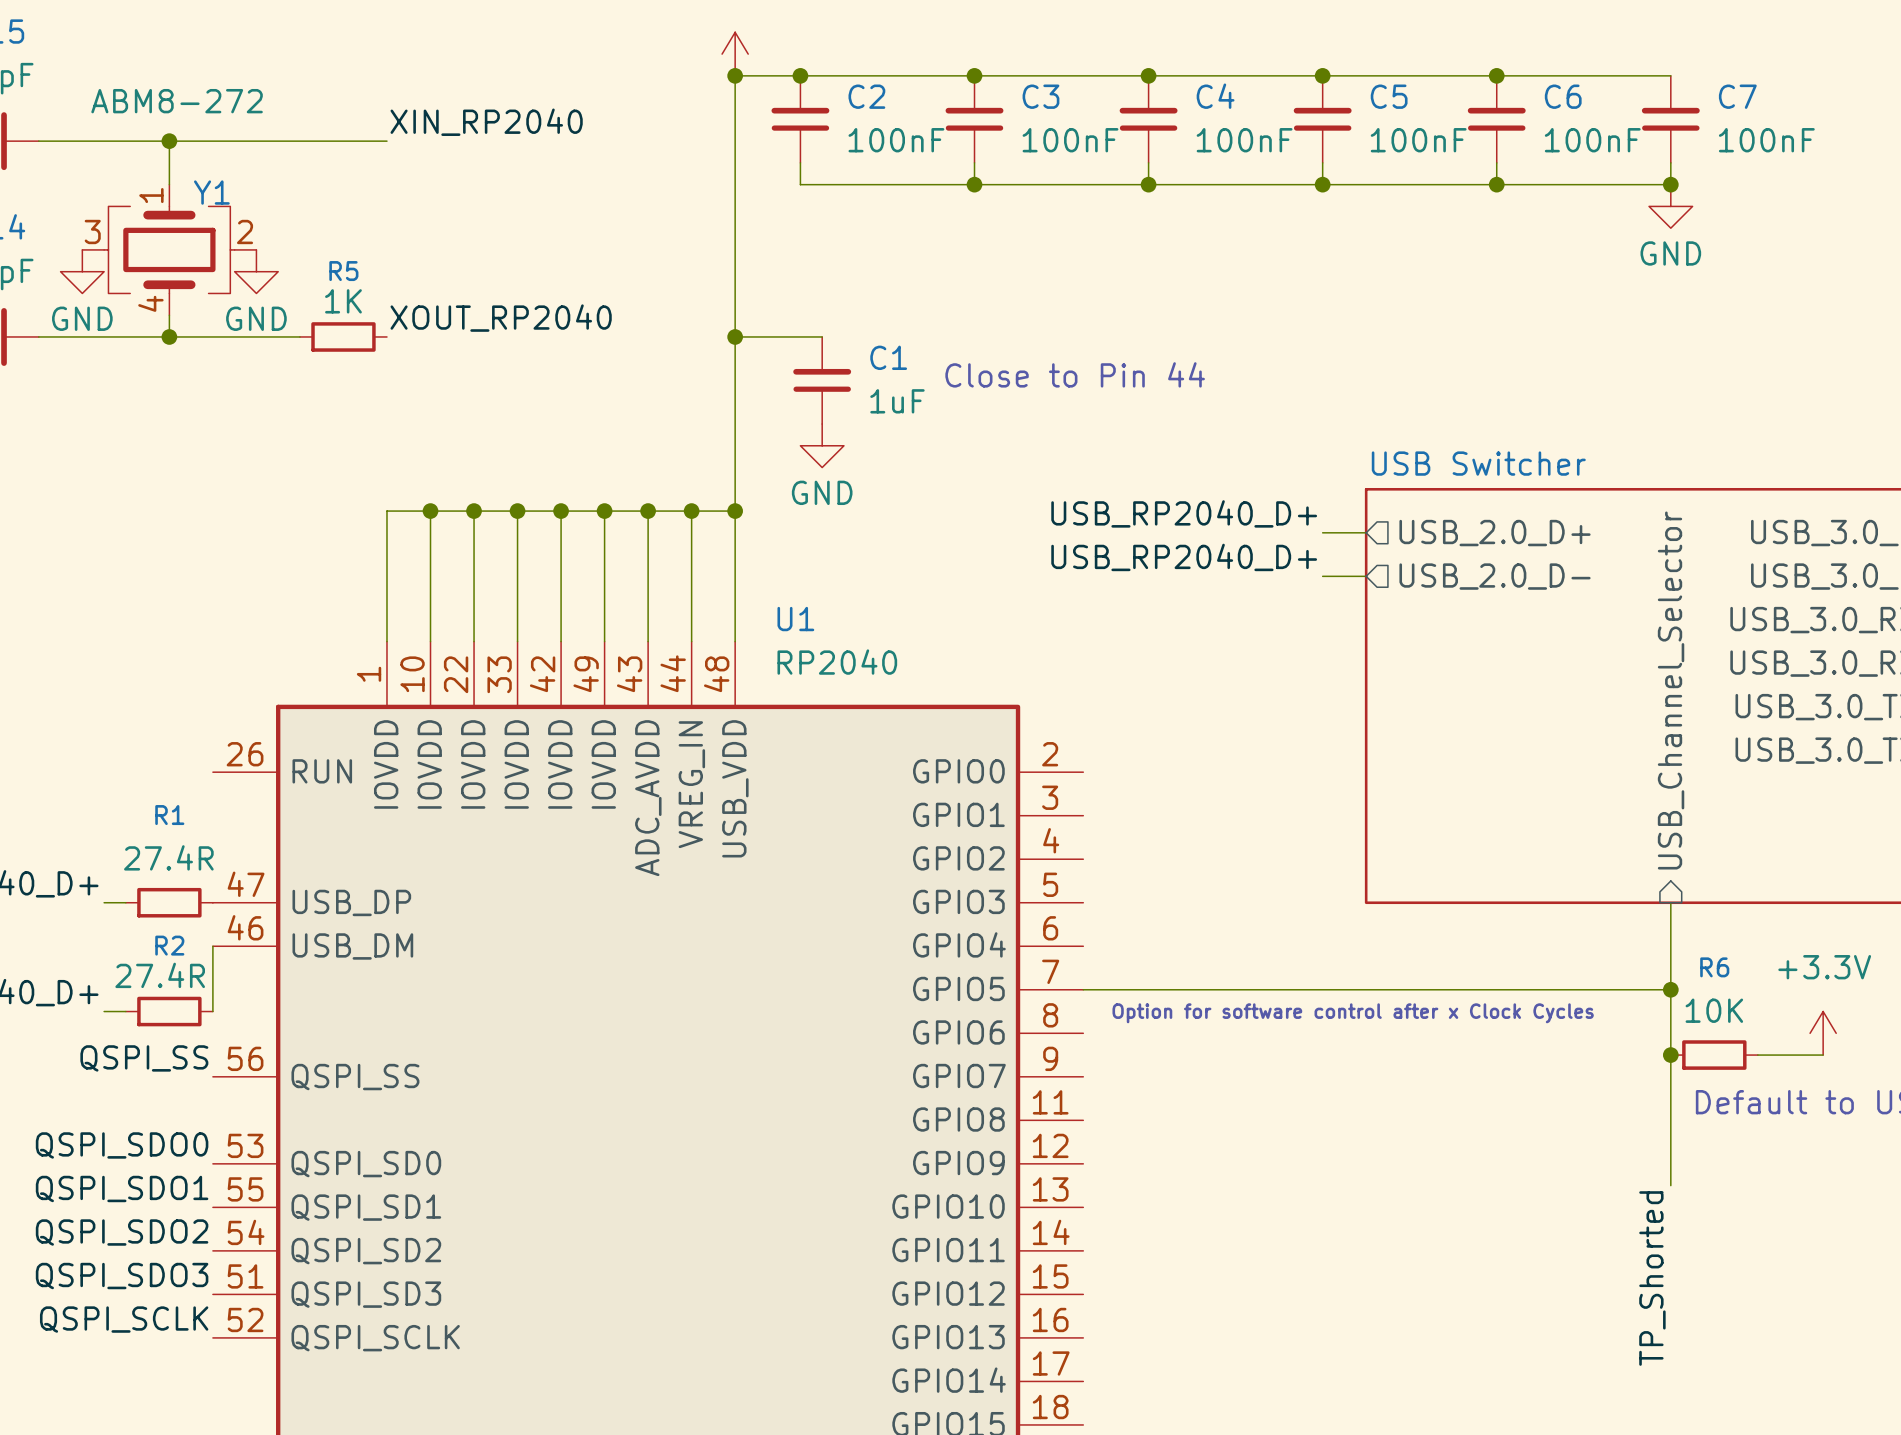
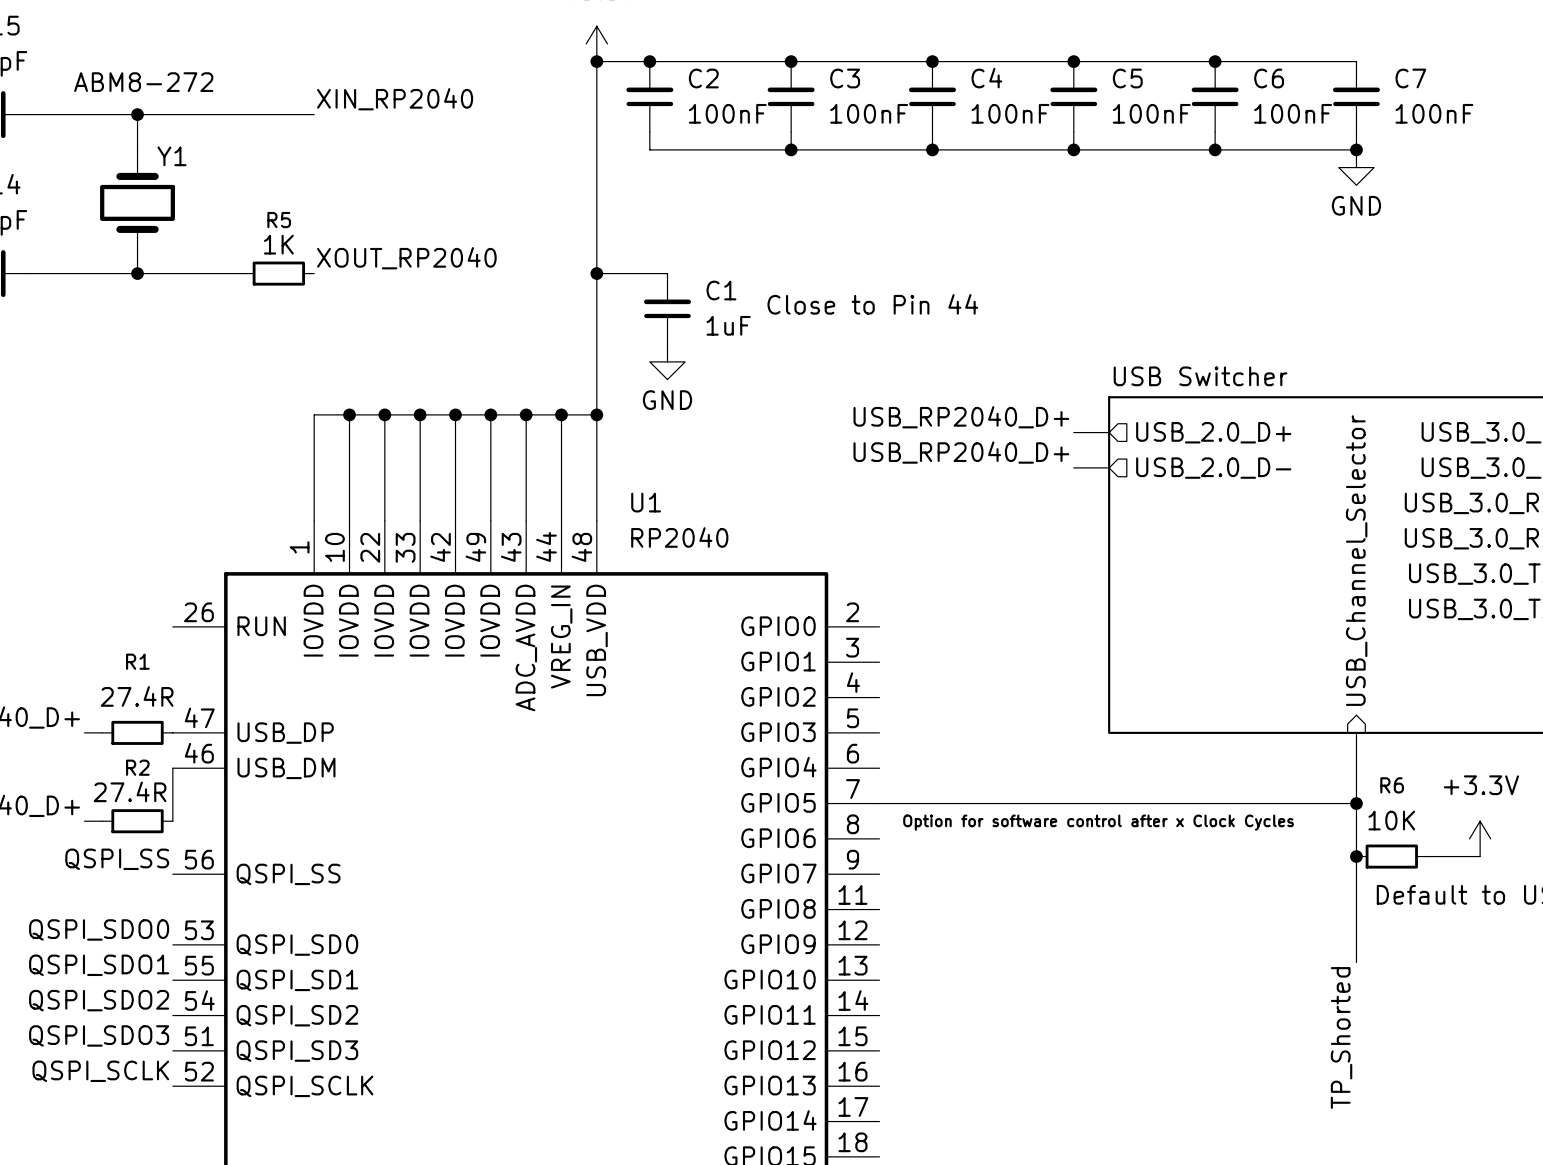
Y1 symbol: [82, 184, 257, 316] -> [100, 149, 175, 256]
power symbol: GND (82, 271) -> none
power symbol: GND (256, 271) -> none

